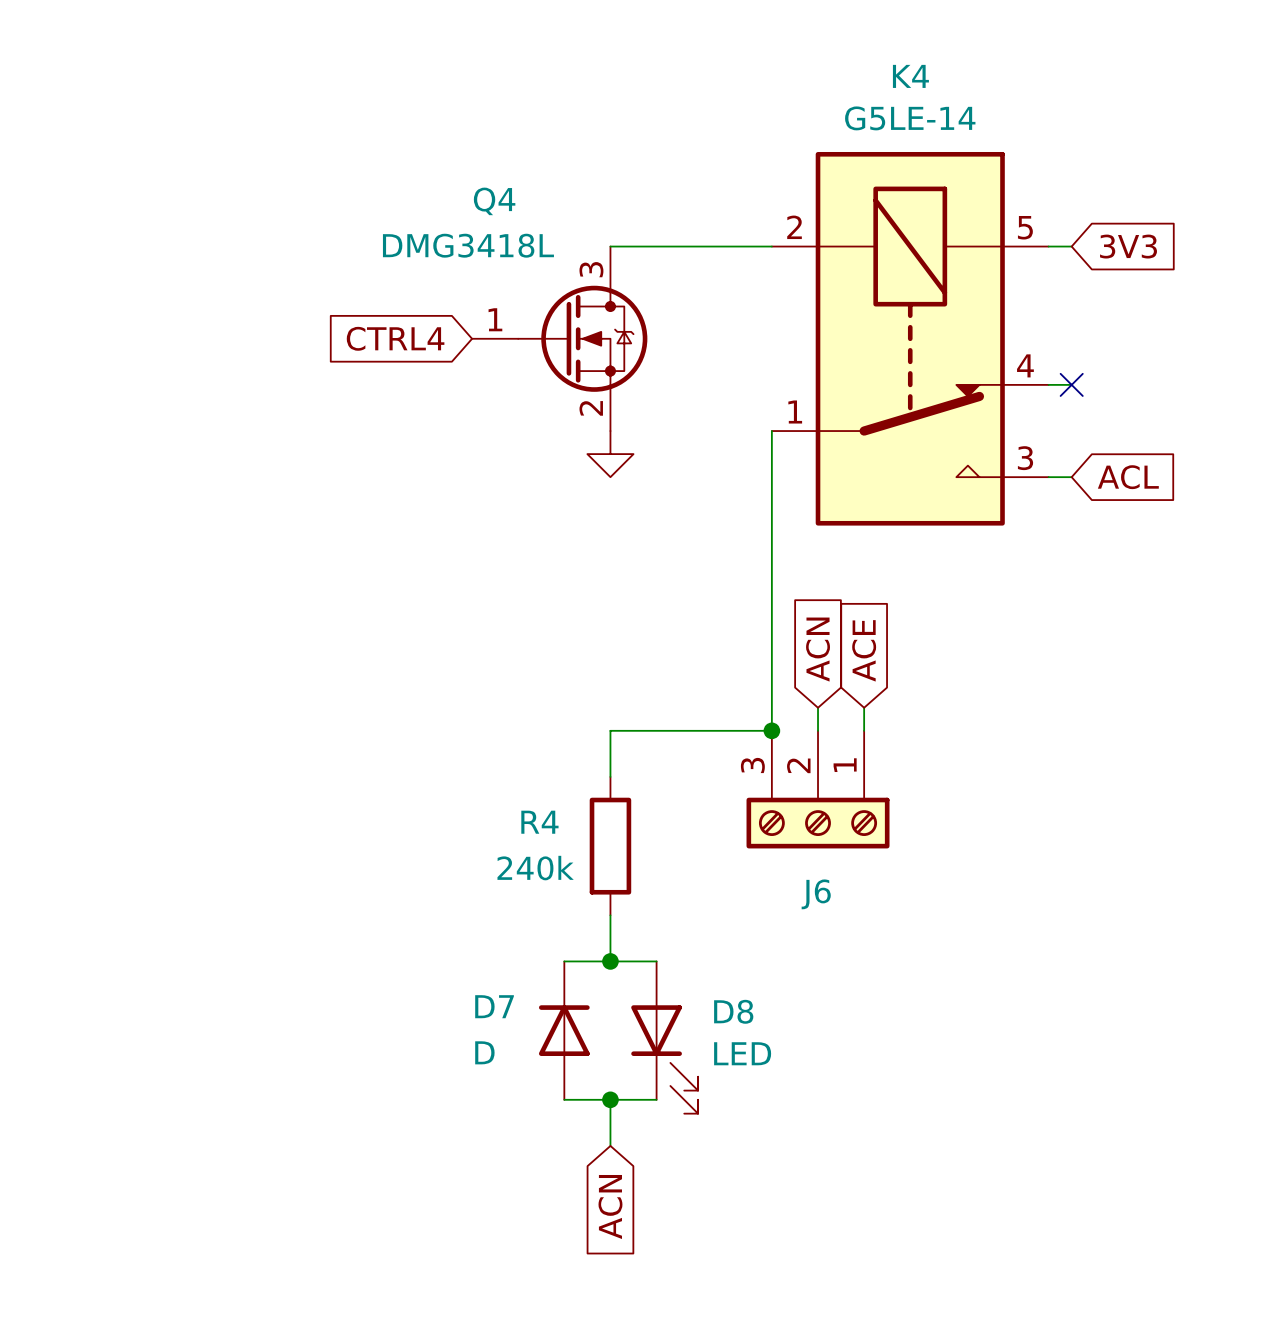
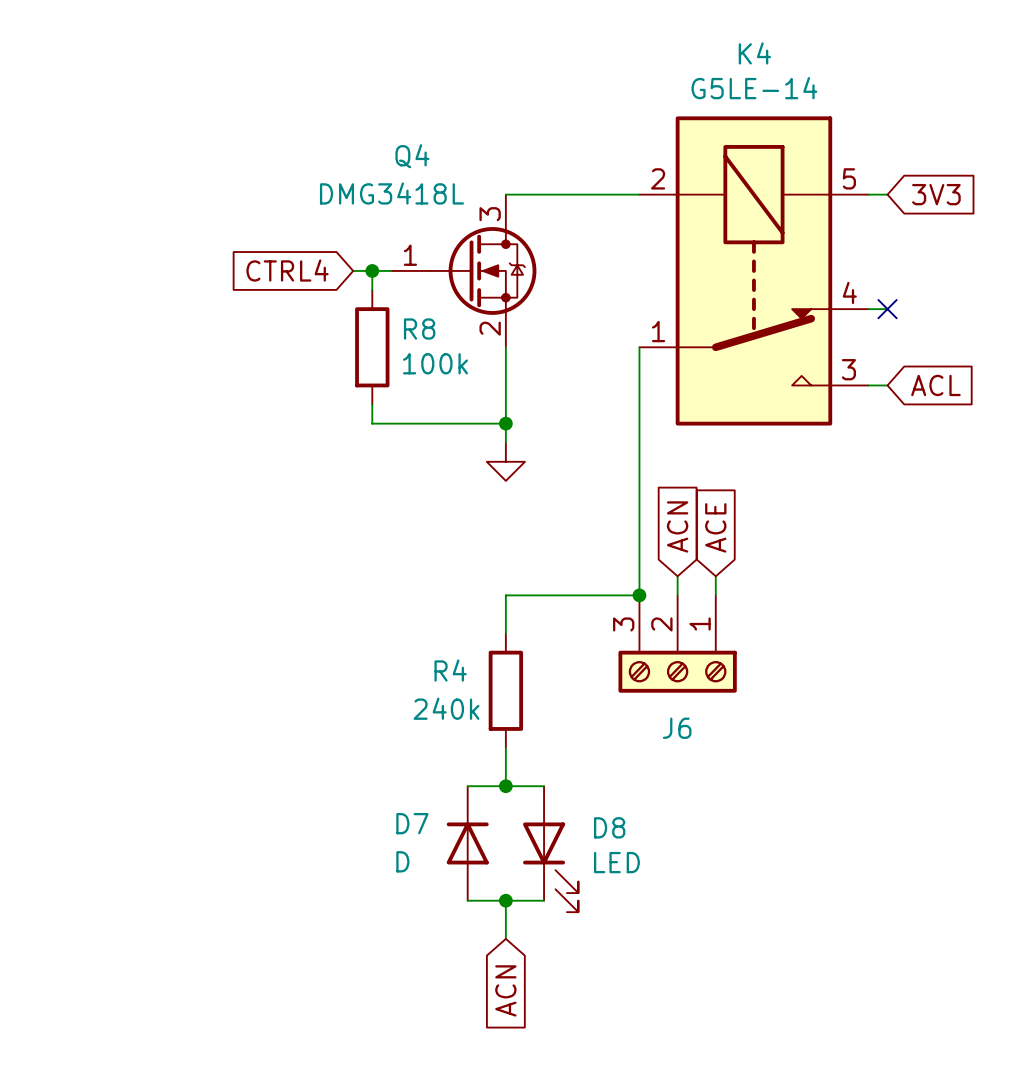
global label position: CTRL4 (395, 338) -> CTRL4 (287, 270)
wire: none -> (353, 270) (391, 270)
wire: none -> (372, 270) (372, 290)
junction: none -> (372, 270)
R8: none -> 100k (372, 347)
wire: none -> (505, 347) (505, 442)
power symbol position: (610, 454) -> (505, 461)
wire: none -> (372, 404) (372, 423) (505, 423)
junction: none -> (505, 423)

